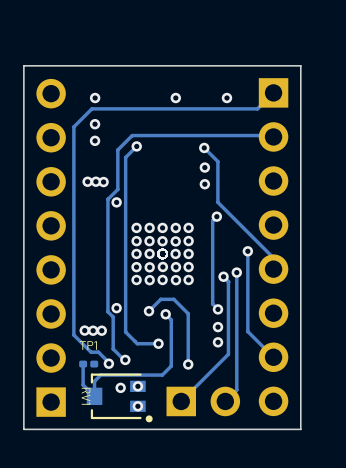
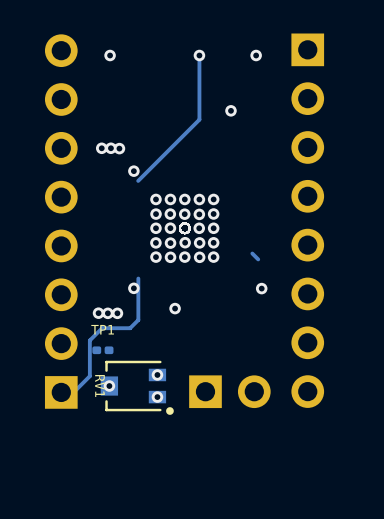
board edge: (300, 65) (23, 65) (23, 429) (300, 429) (300, 65) -> none
track: (273, 92) (257, 108) (91, 108) (73, 126) (73, 335) (91, 352) (98, 352) (108, 363) -> none
track: none -> (199, 55) (199, 119) (138, 180)
via: (95, 124) -> none
track: (273, 136) (132, 135) (117, 149) (117, 189) (107, 199) (107, 311) (113, 317) (113, 349) (125, 359) -> none
via: (95, 140) -> none
track: (136, 146) (125, 157) (125, 332) (137, 343) (158, 343) -> none
via: (136, 146) -> none
track: (204, 147) (217, 161) (217, 202) (273, 258) (273, 269) -> none
via: (204, 167) -> none
via: (204, 184) -> none
track: (216, 216) (212, 220) (212, 304) (217, 309) -> none
via: (216, 216) -> none
track: (247, 251) (247, 331) (273, 357) -> none
via: (247, 251) -> none
track: (236, 272) (236, 389) (225, 401) -> none
via: (236, 272) -> none
via: (223, 276) -> none
track: (228, 281) (228, 354) (181, 401) (189, 401) -> none
track: none -> (138, 278) (138, 320) (130, 328) (102, 328) (89, 340) (89, 376) (73, 392) (61, 392)
via: none -> (261, 288)
via: (217, 309) -> none
track: (149, 311) (160, 299) (173, 299) (188, 313) (188, 364) -> none
via: (149, 311) -> none
track: (165, 314) (171, 319) (171, 366) (162, 375) (100, 375) (94, 381) (94, 396) (83, 384) (83, 364) -> none
via: (165, 314) -> none
via: none -> (175, 308)
via: (217, 327) -> none
via: (218, 342) -> none
via: (158, 343) -> none
via: (125, 359) -> none
via: (108, 363) -> none
via: (188, 364) -> none
via: (120, 387) -> none
via: none -> (109, 386)

